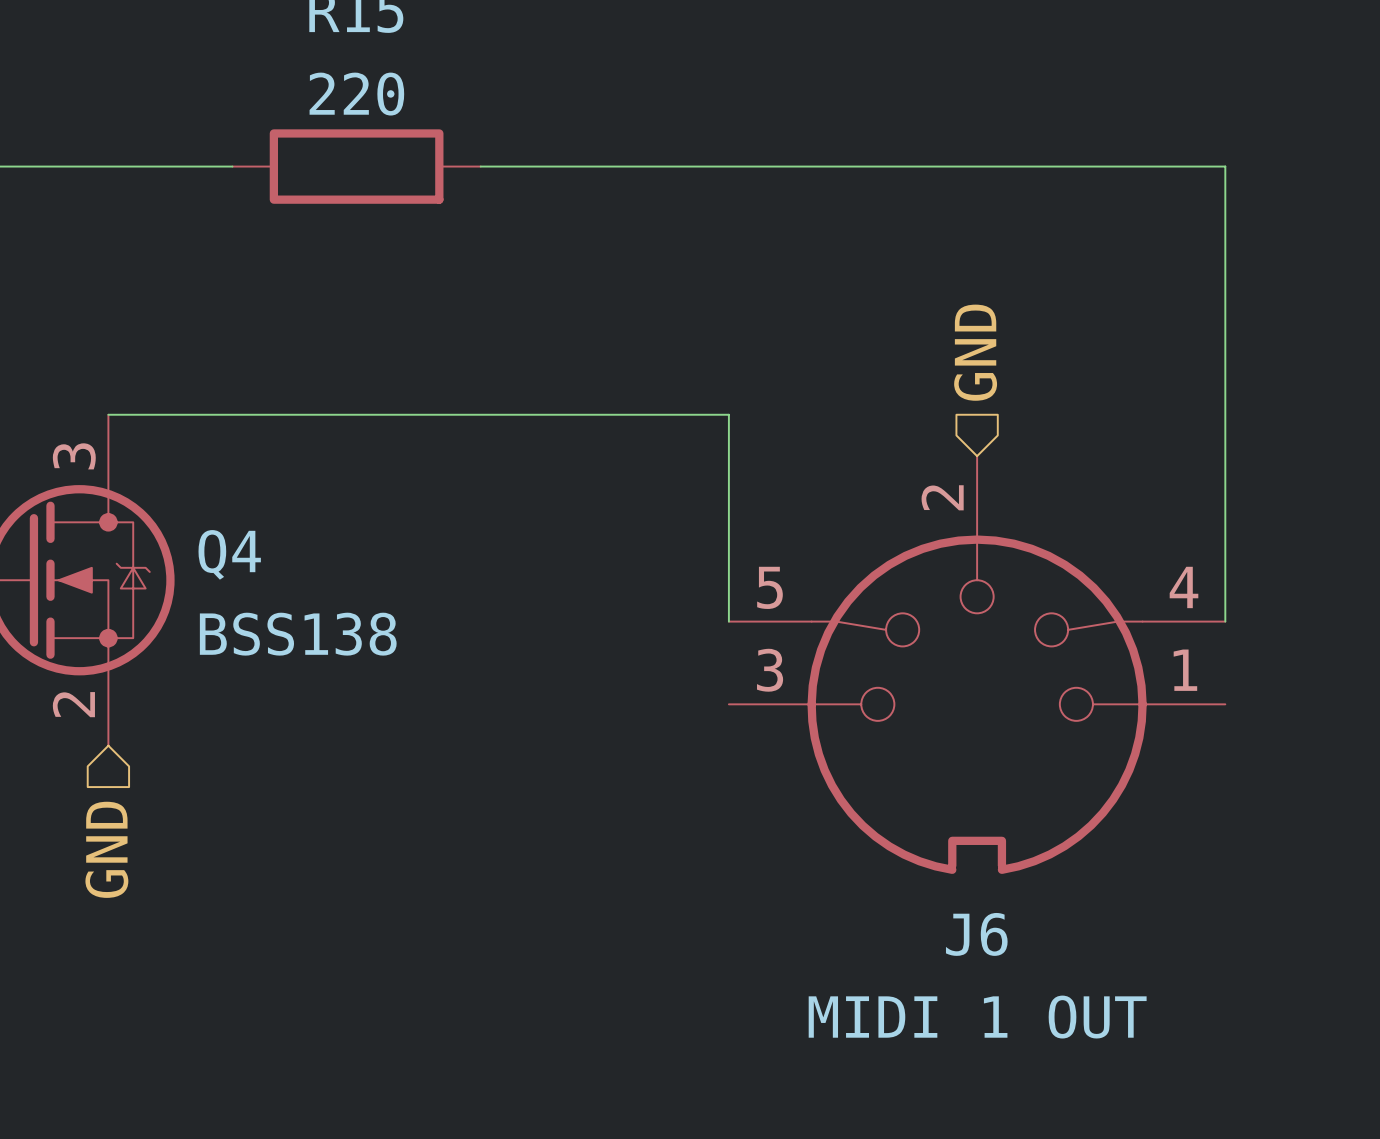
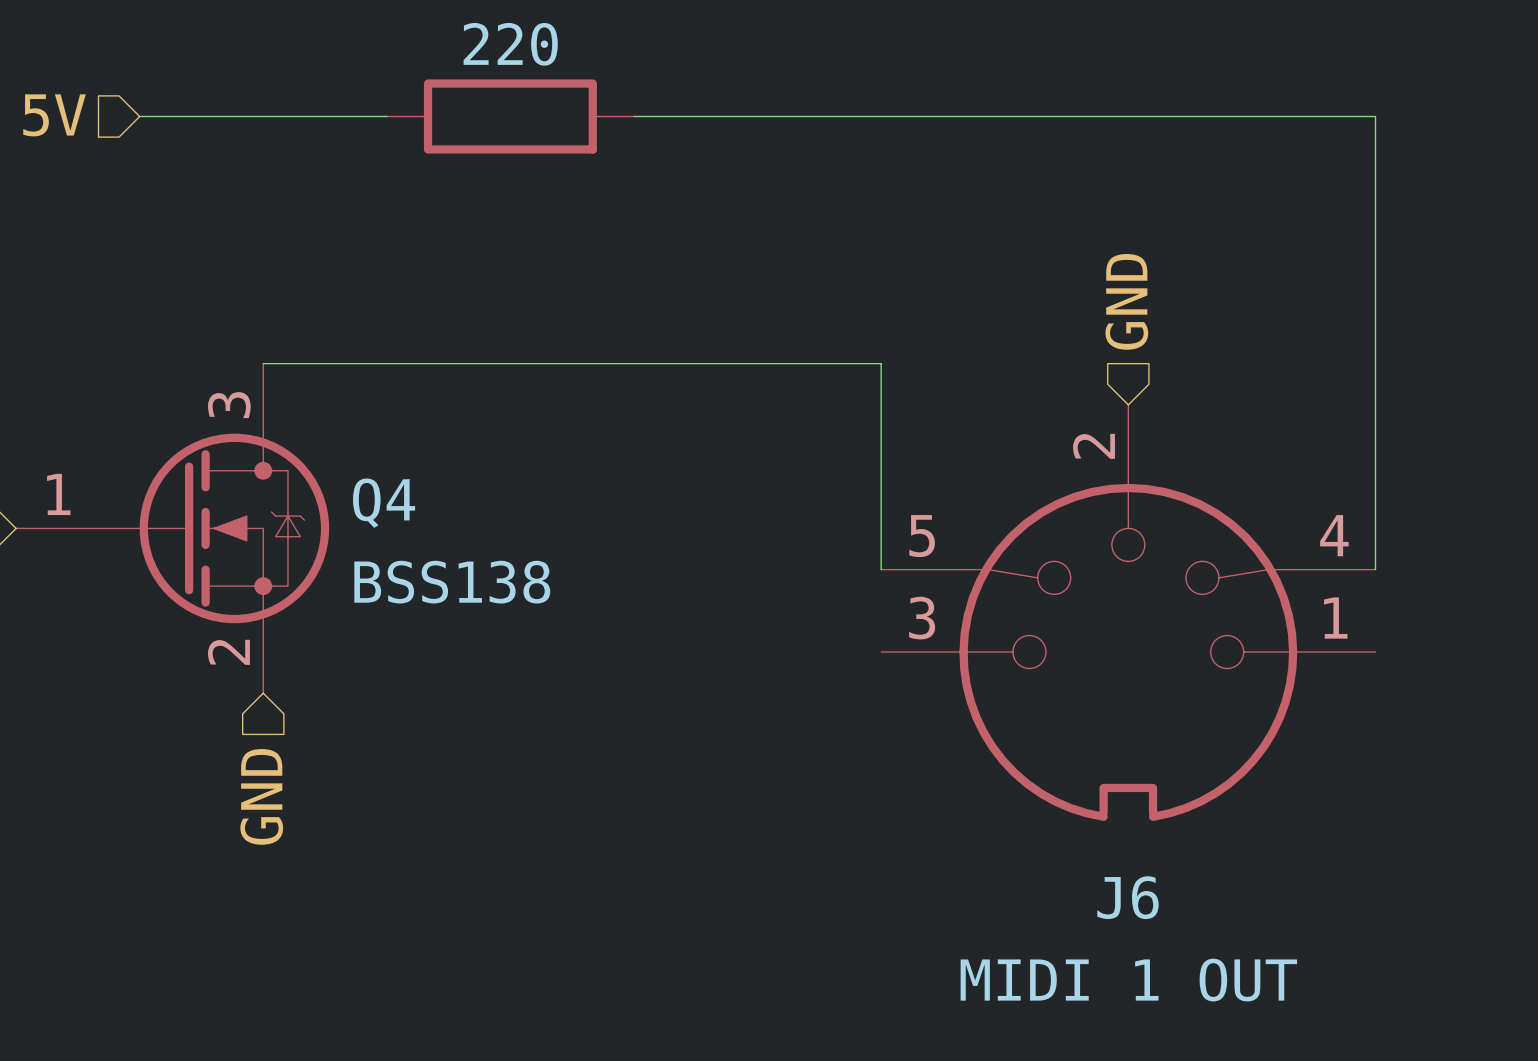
J6 name position: J6 (976, 934) -> J6 (1128, 897)
J6 value position: MIDI 1 OUT (977, 1017) -> MIDI 1 OUT (1128, 980)

